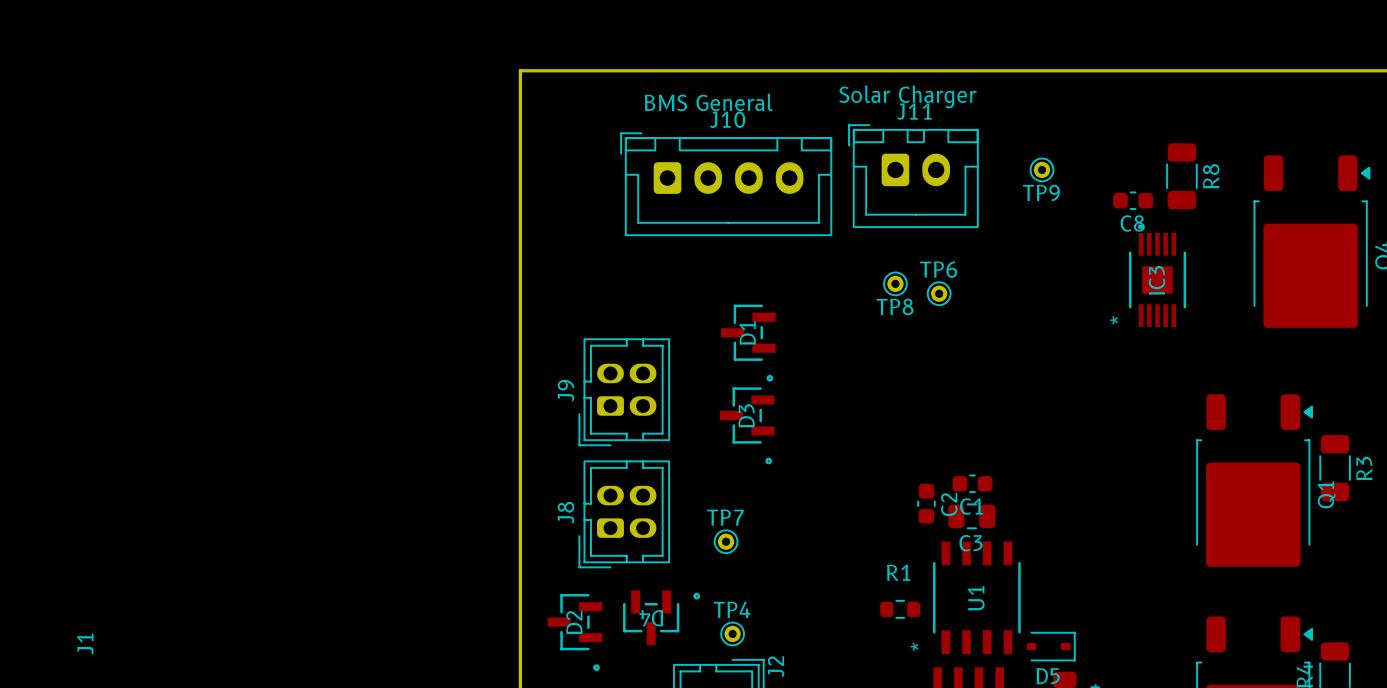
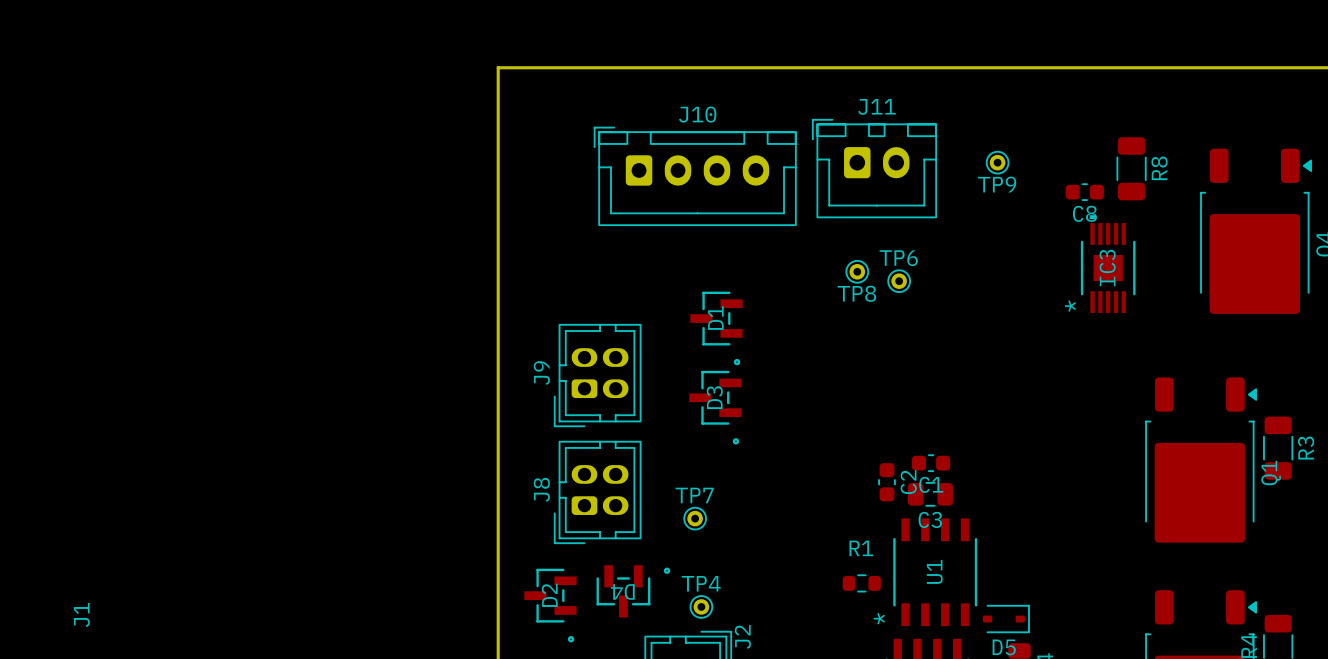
text: Solar Charger (907, 96) -> none
text: BMS General (708, 102) -> none

